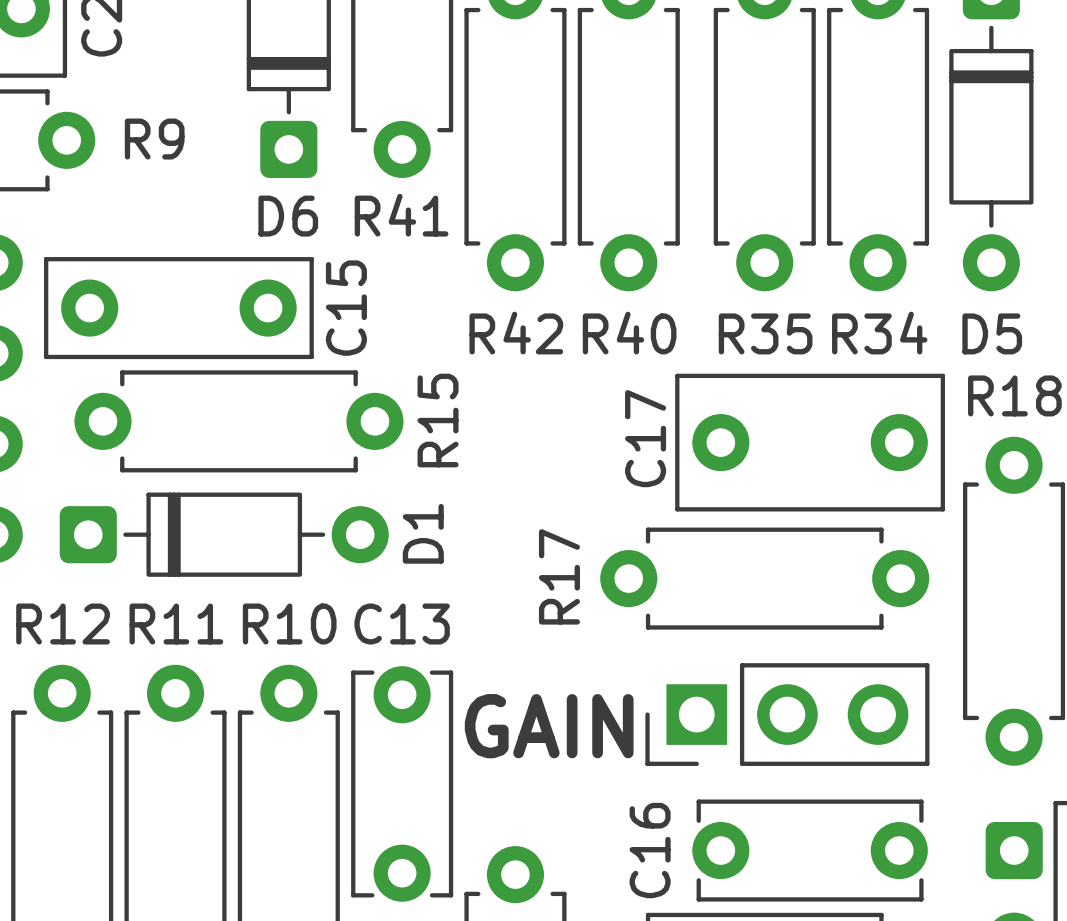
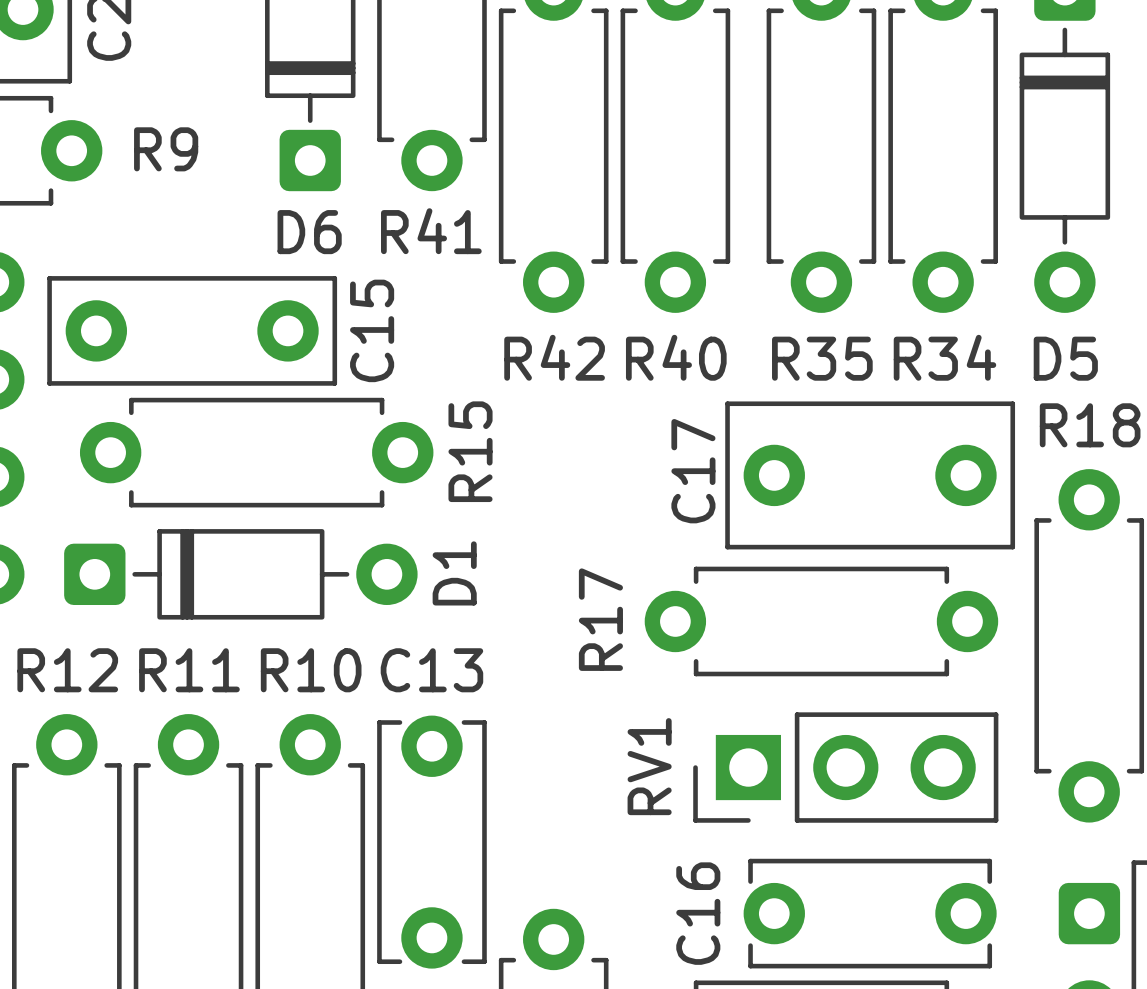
RV1 name: none -> RV1 (649, 766)
RV1 text: GAIN (549, 726) -> none

